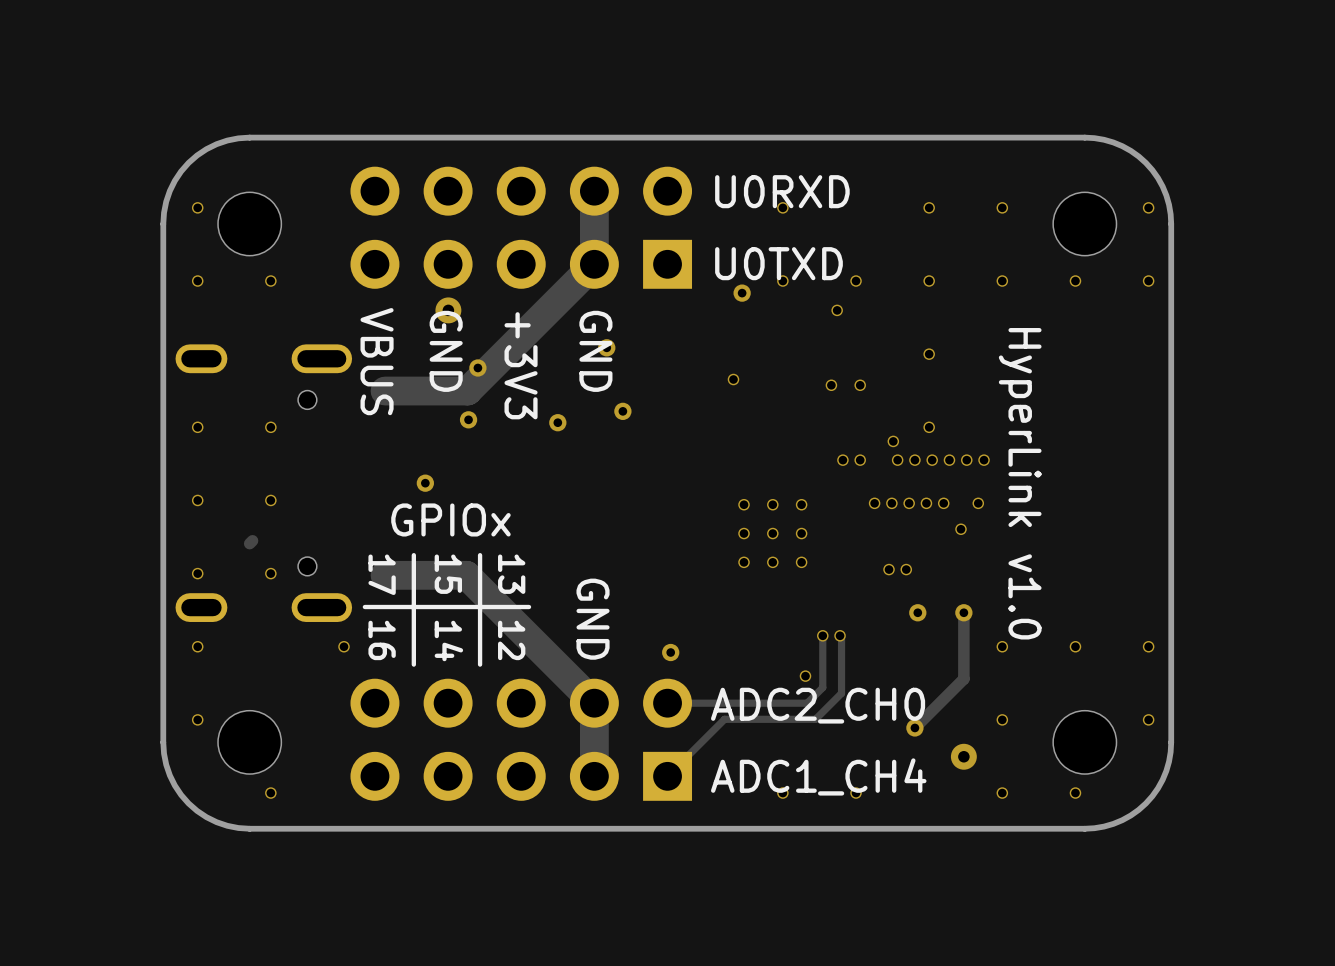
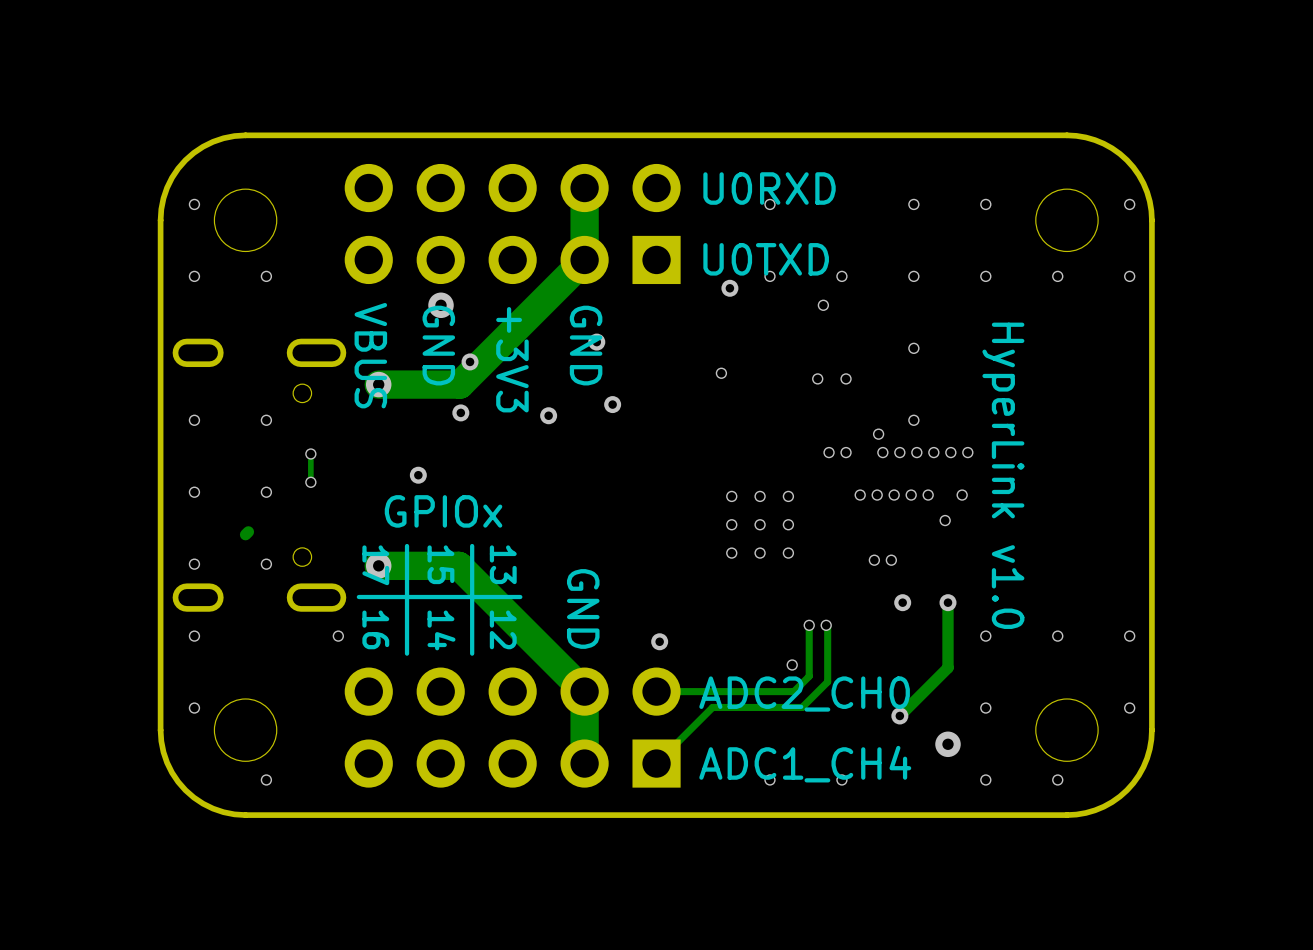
via: none -> (378, 384)
track: none -> (310, 453) (310, 482)
via: none -> (310, 453)
via: none -> (310, 482)
via: none -> (378, 565)

